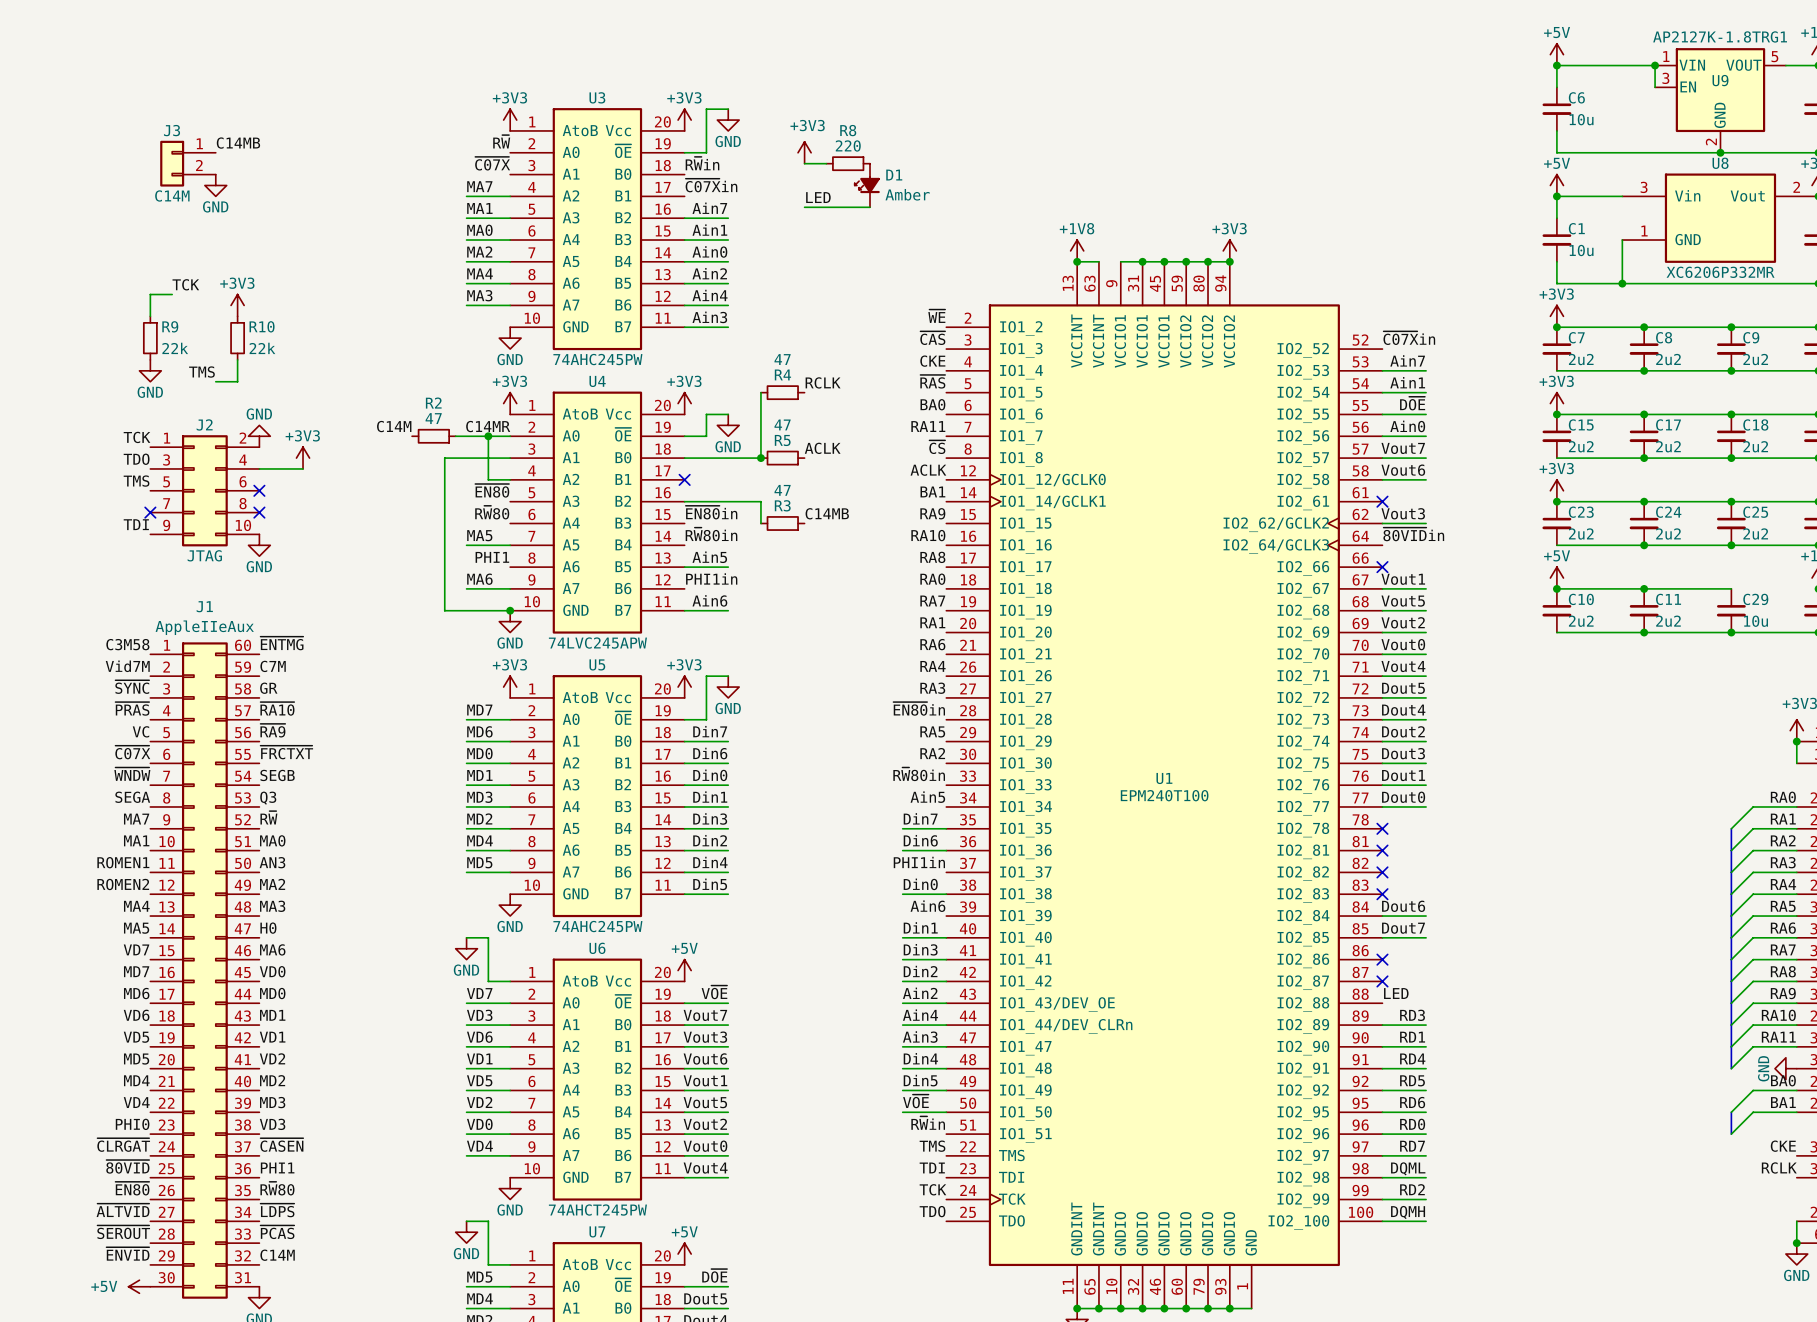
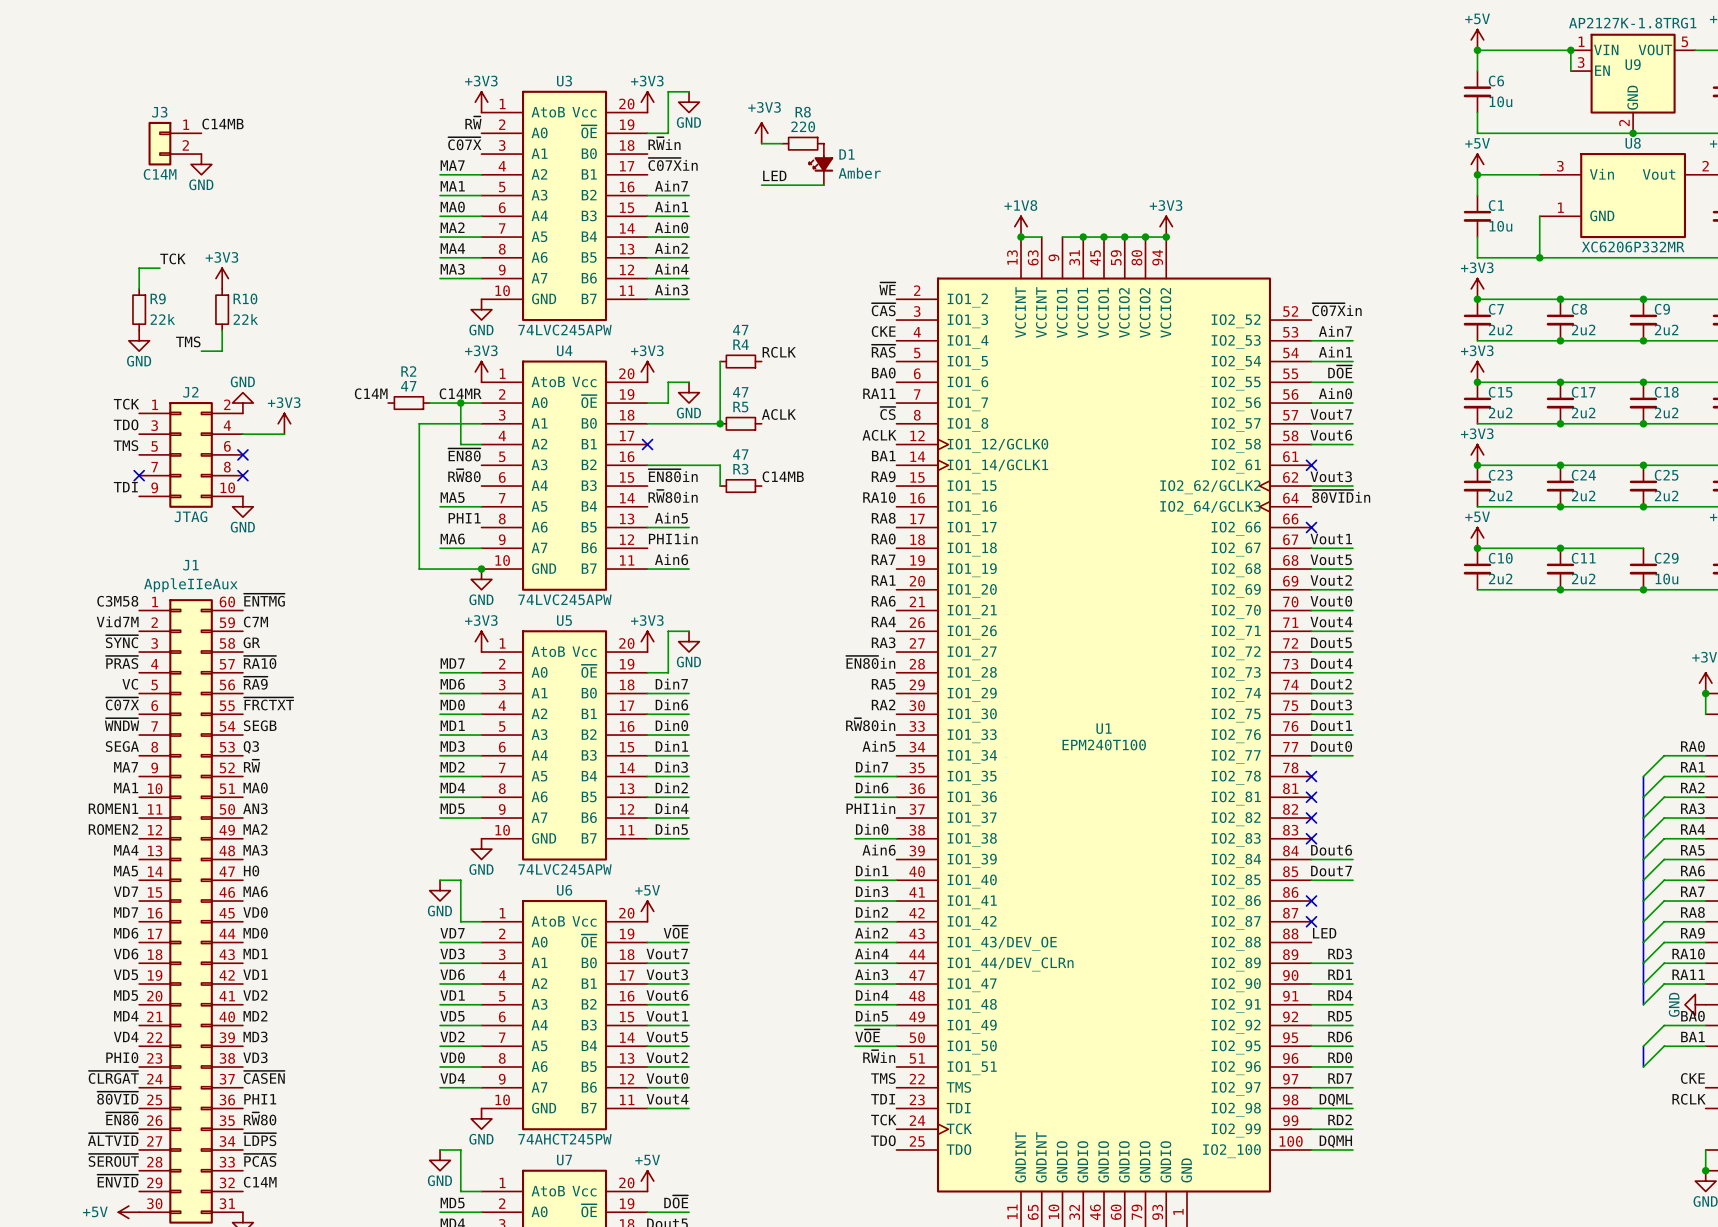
U3 value: 74AHC245PW (597, 359) -> 74LVC245APW (565, 330)
U5 value: 74AHC245PW (597, 926) -> 74LVC245APW (565, 869)

